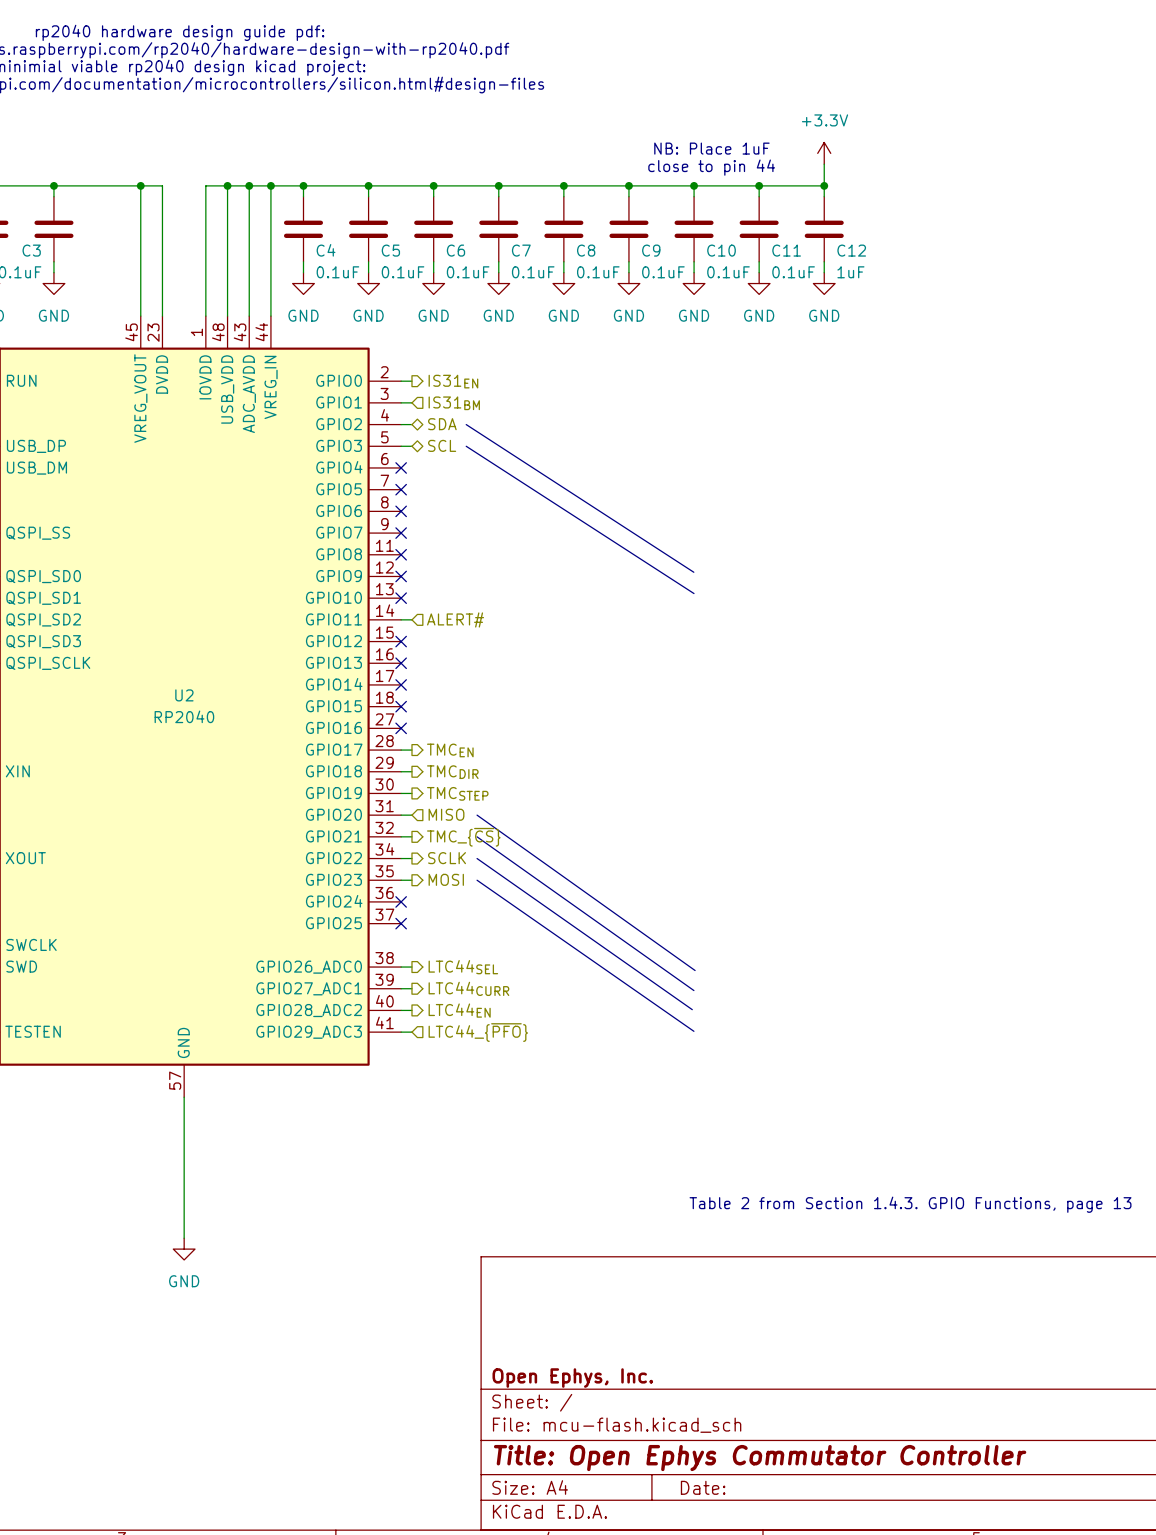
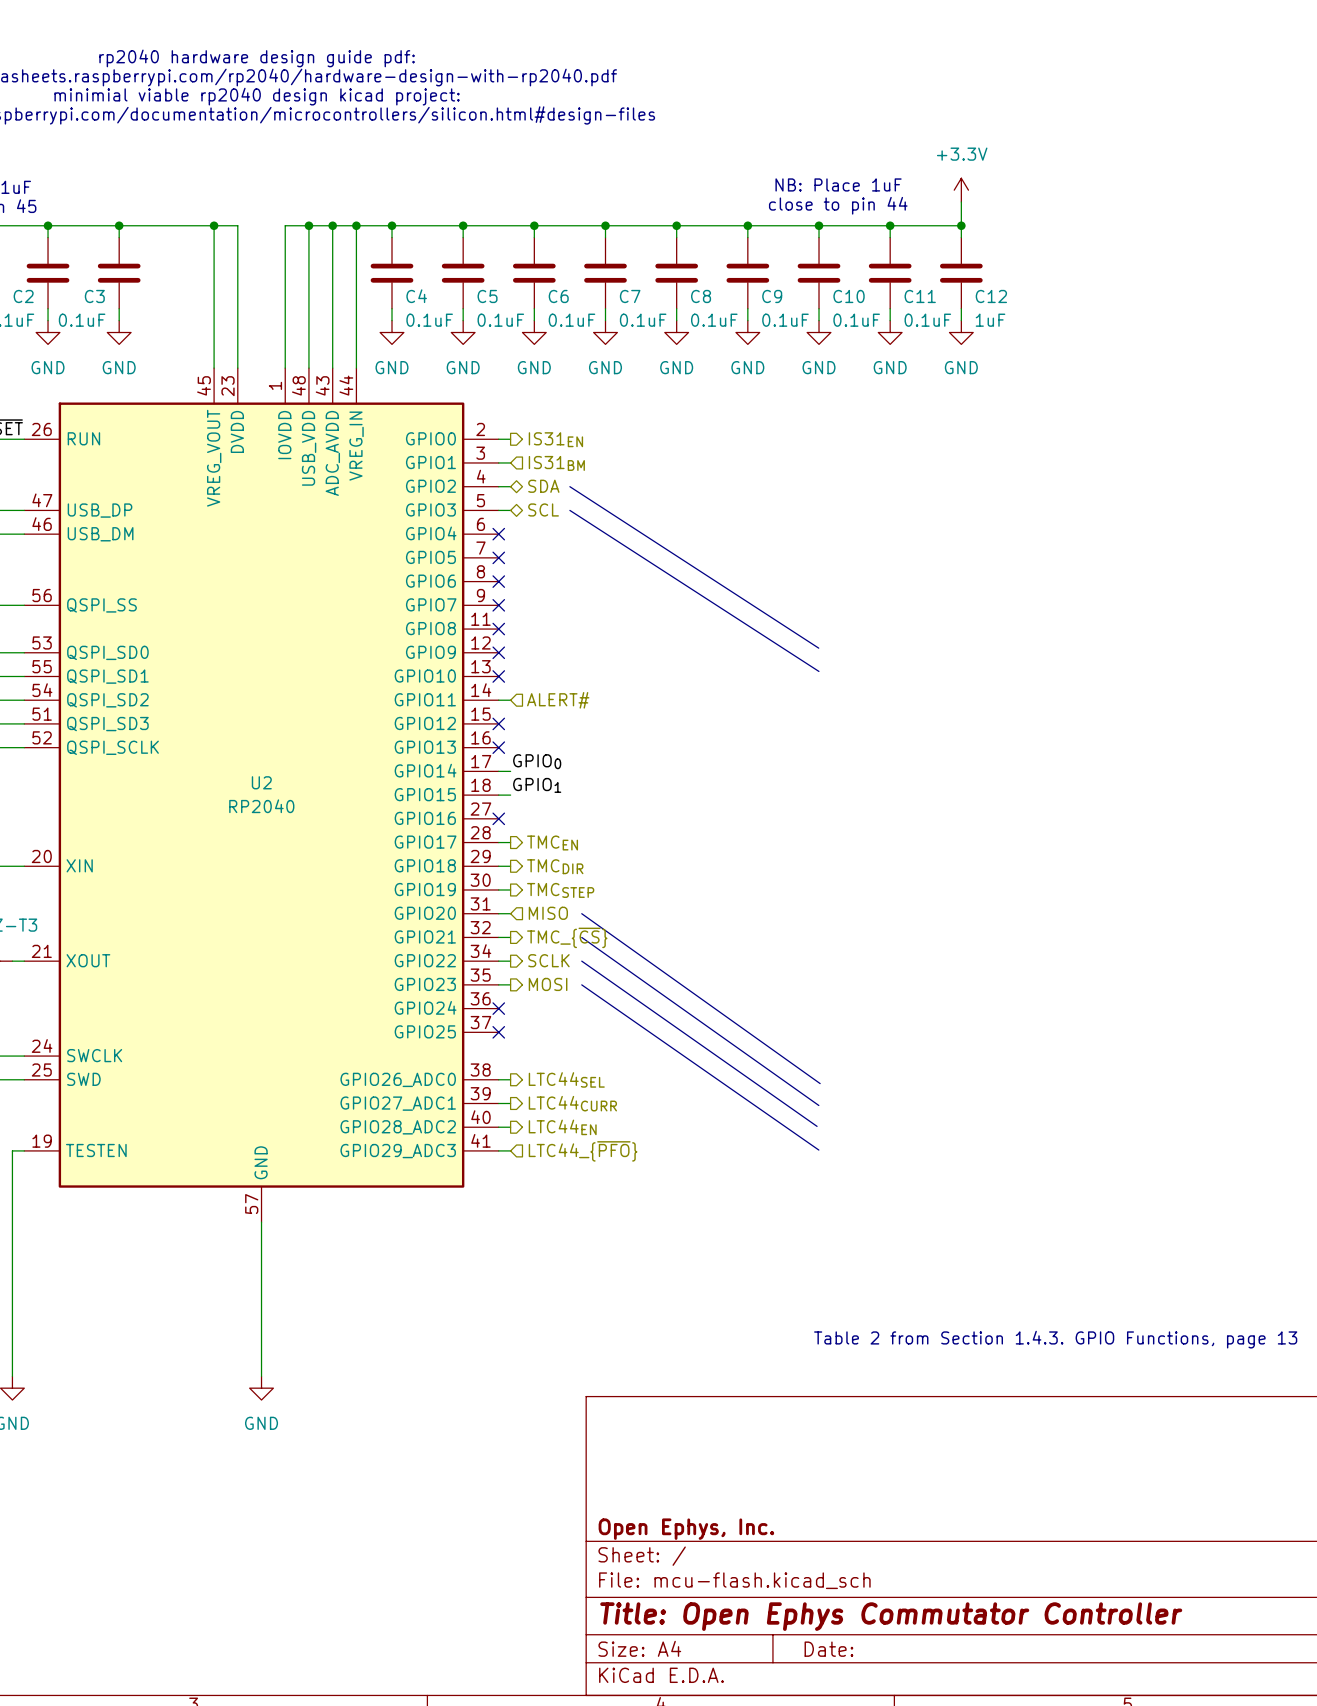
label: none -> GPIO0 (537, 761)
wire: none -> (498, 771) (510, 771)
no-connect mark: (401, 684) -> none
label: none -> GPIO1 (537, 785)
wire: none -> (498, 795) (510, 795)
no-connect mark: (401, 706) -> none

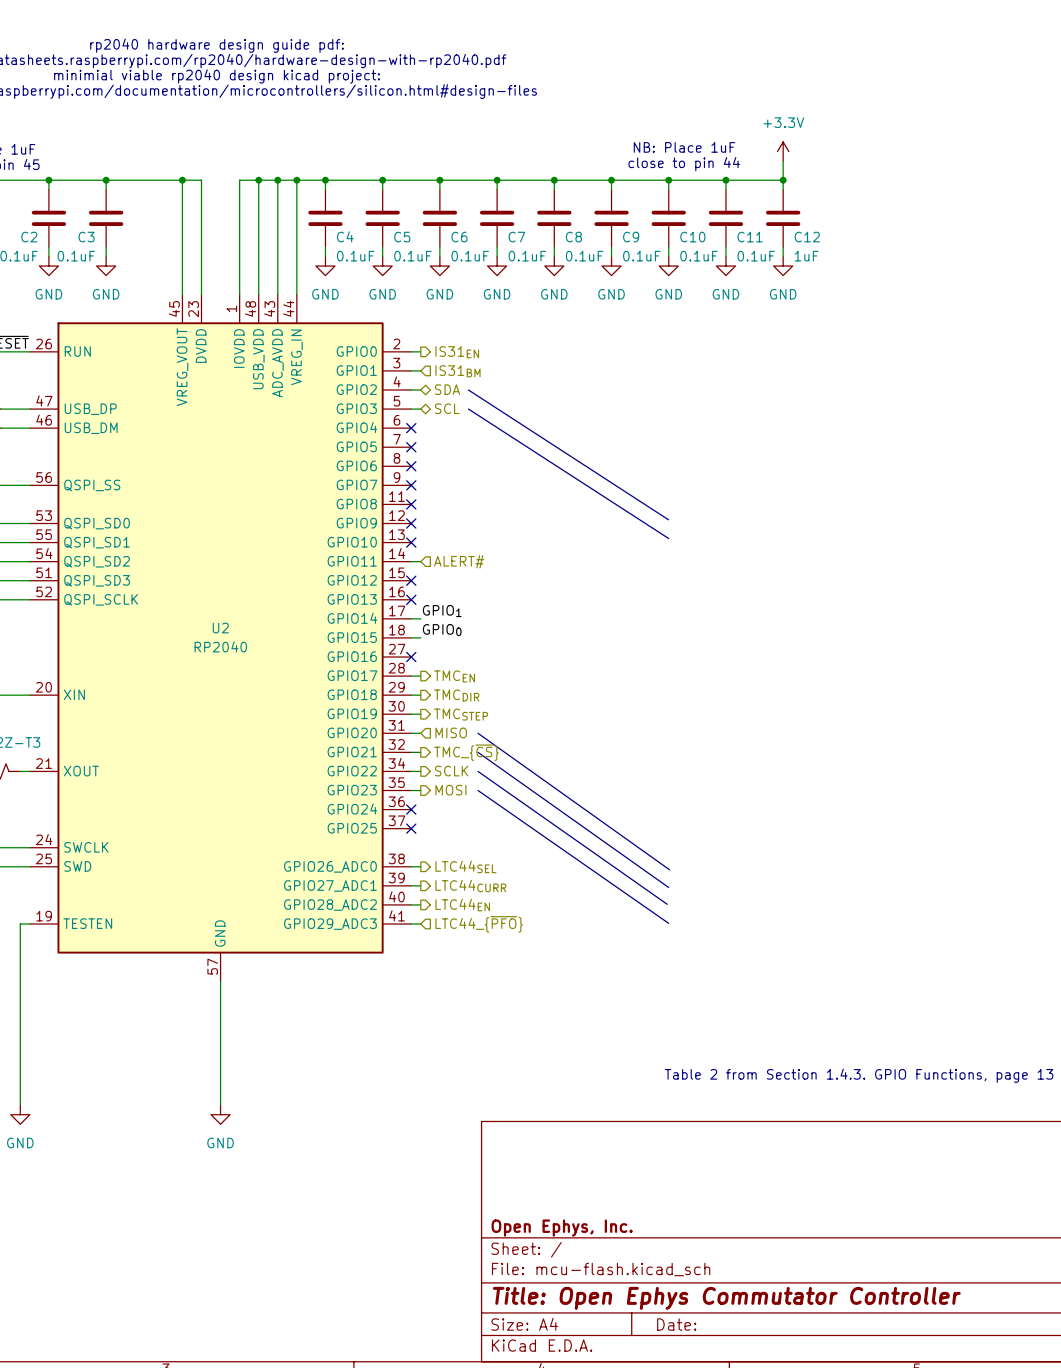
label: GPIO0 (537, 761) -> GPIO1 (442, 611)
label: GPIO1 (537, 785) -> GPIO0 (442, 630)

